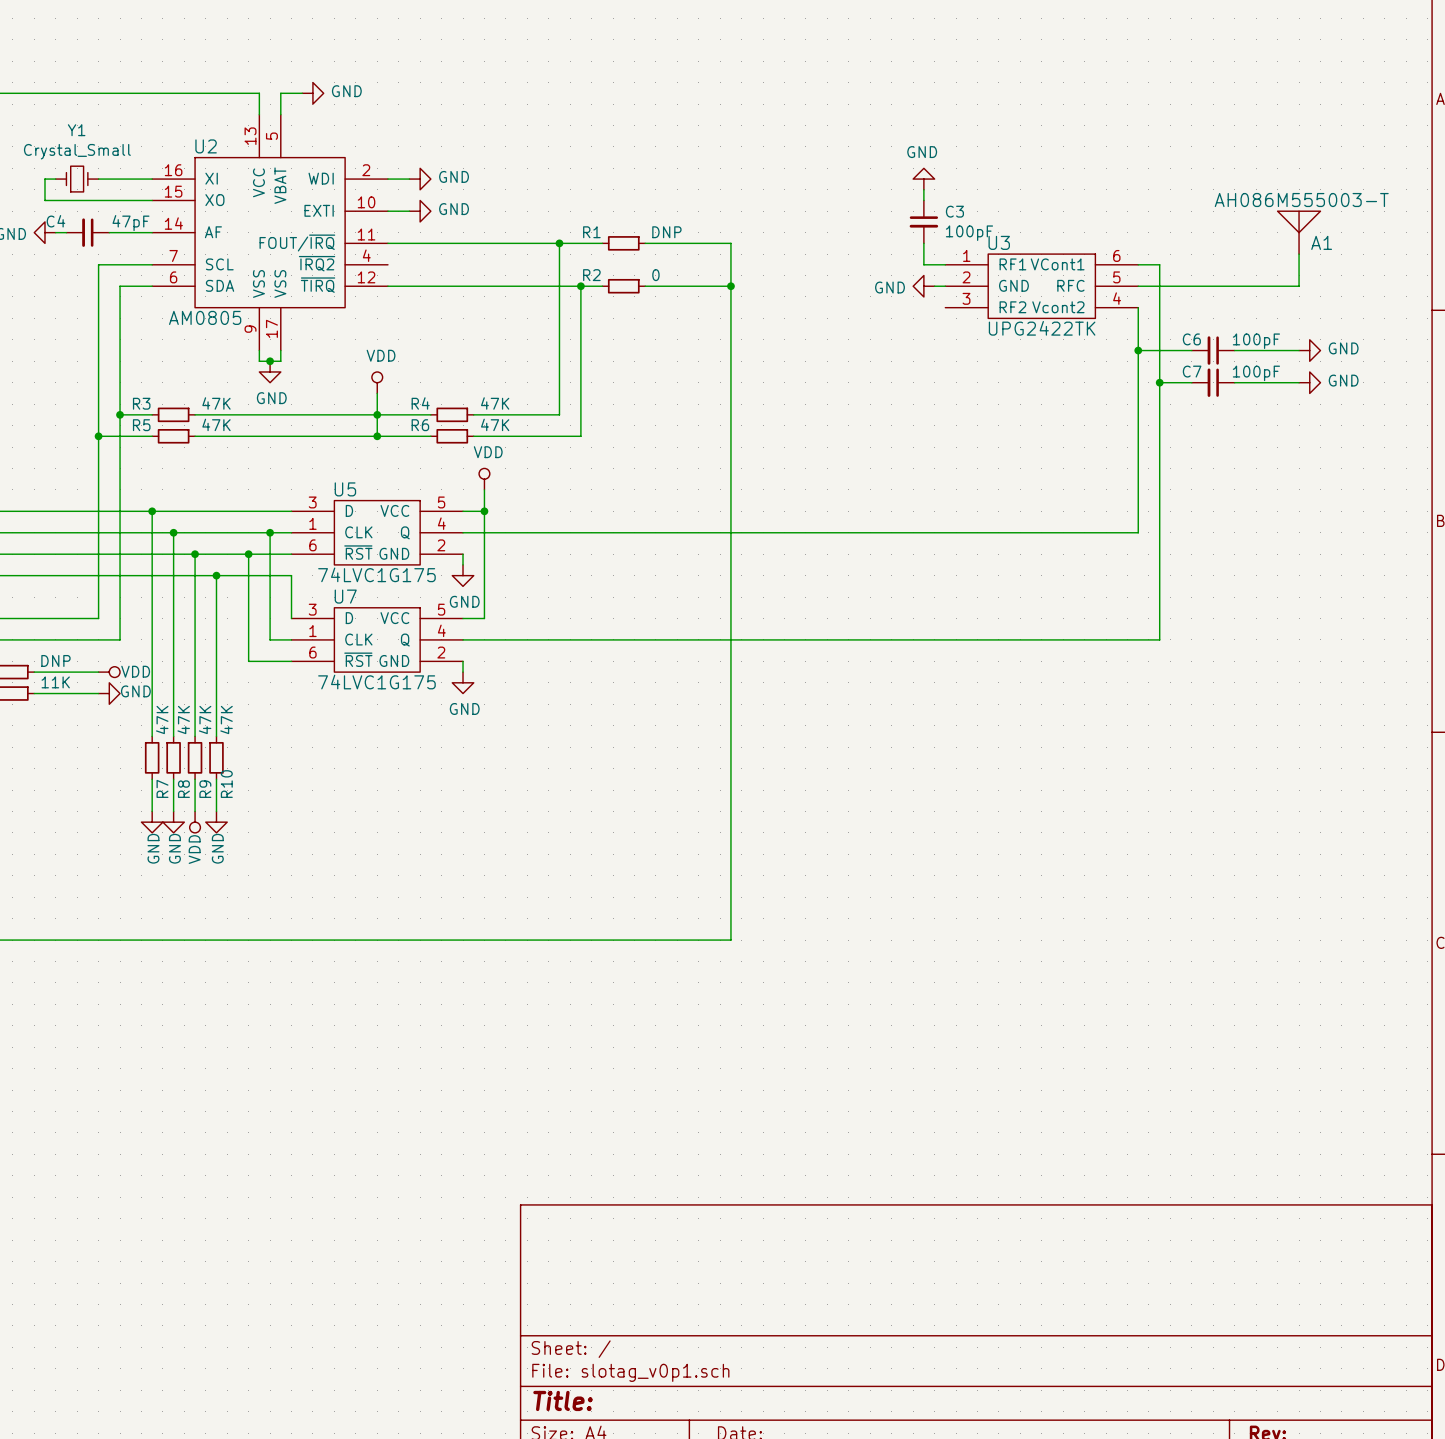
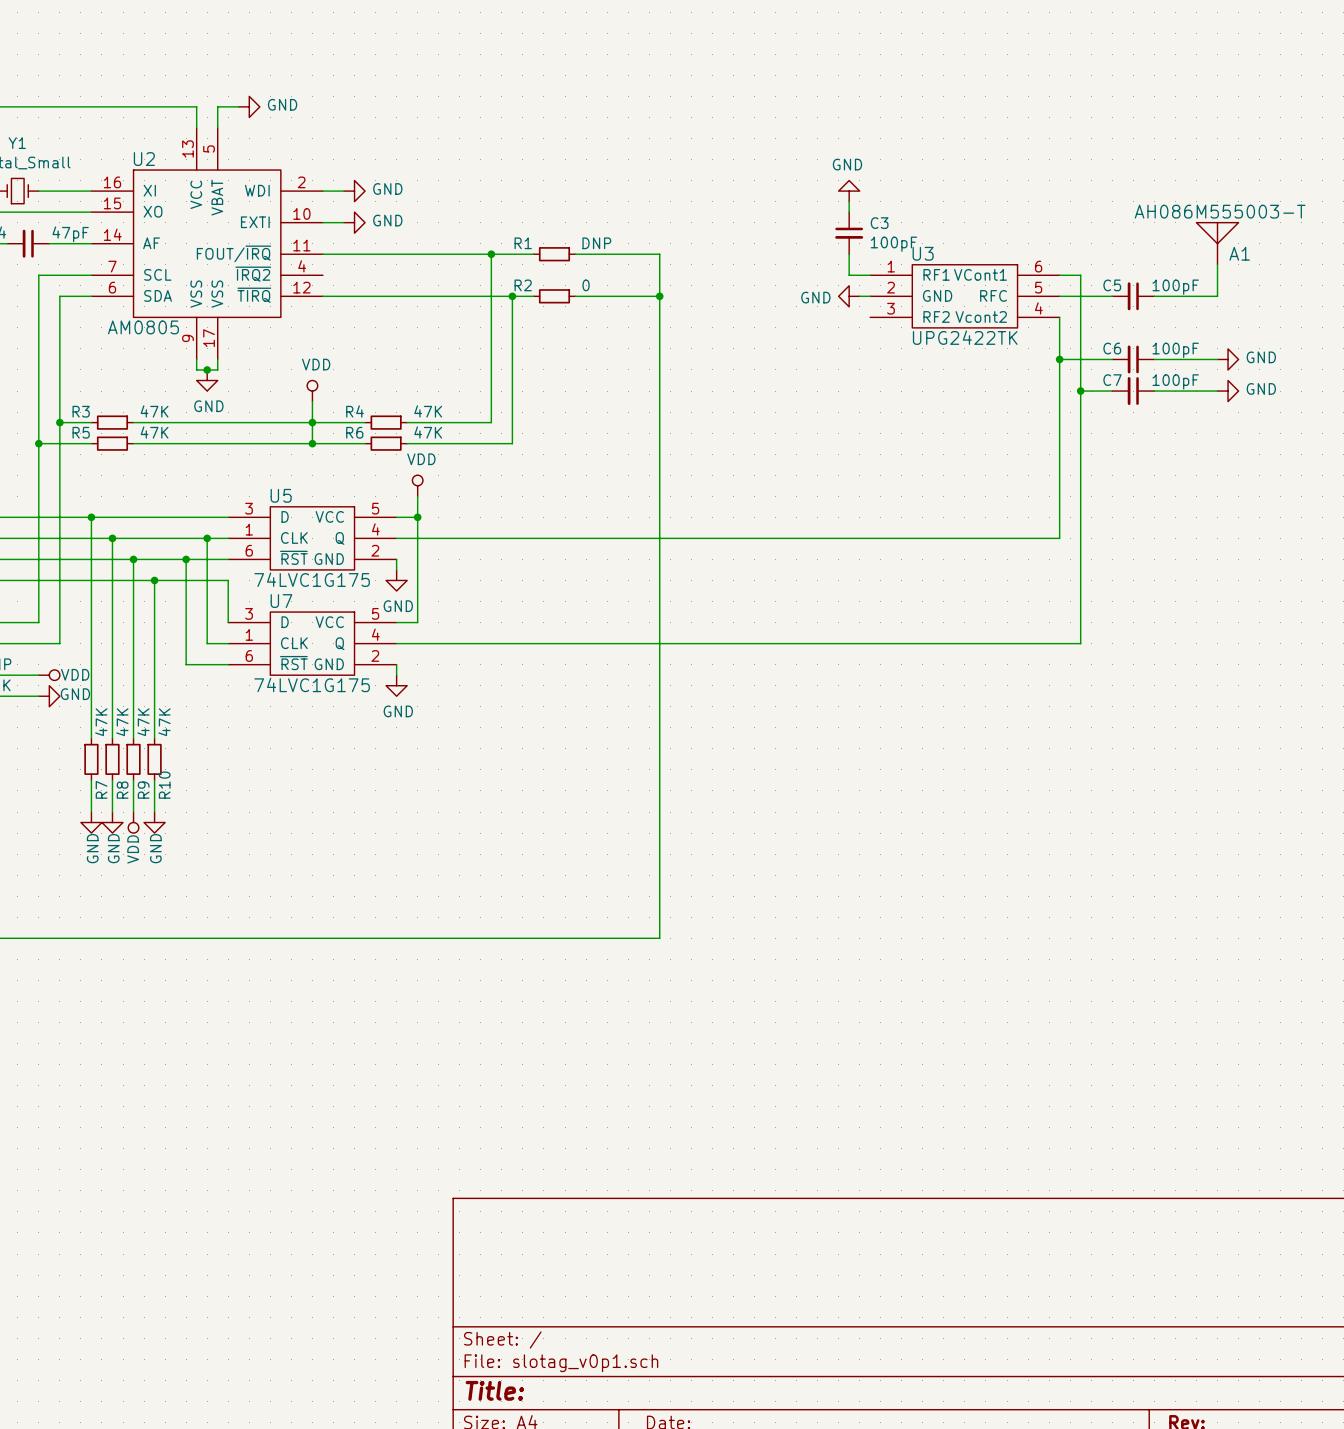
C5: none -> 100pF (1133, 296)

